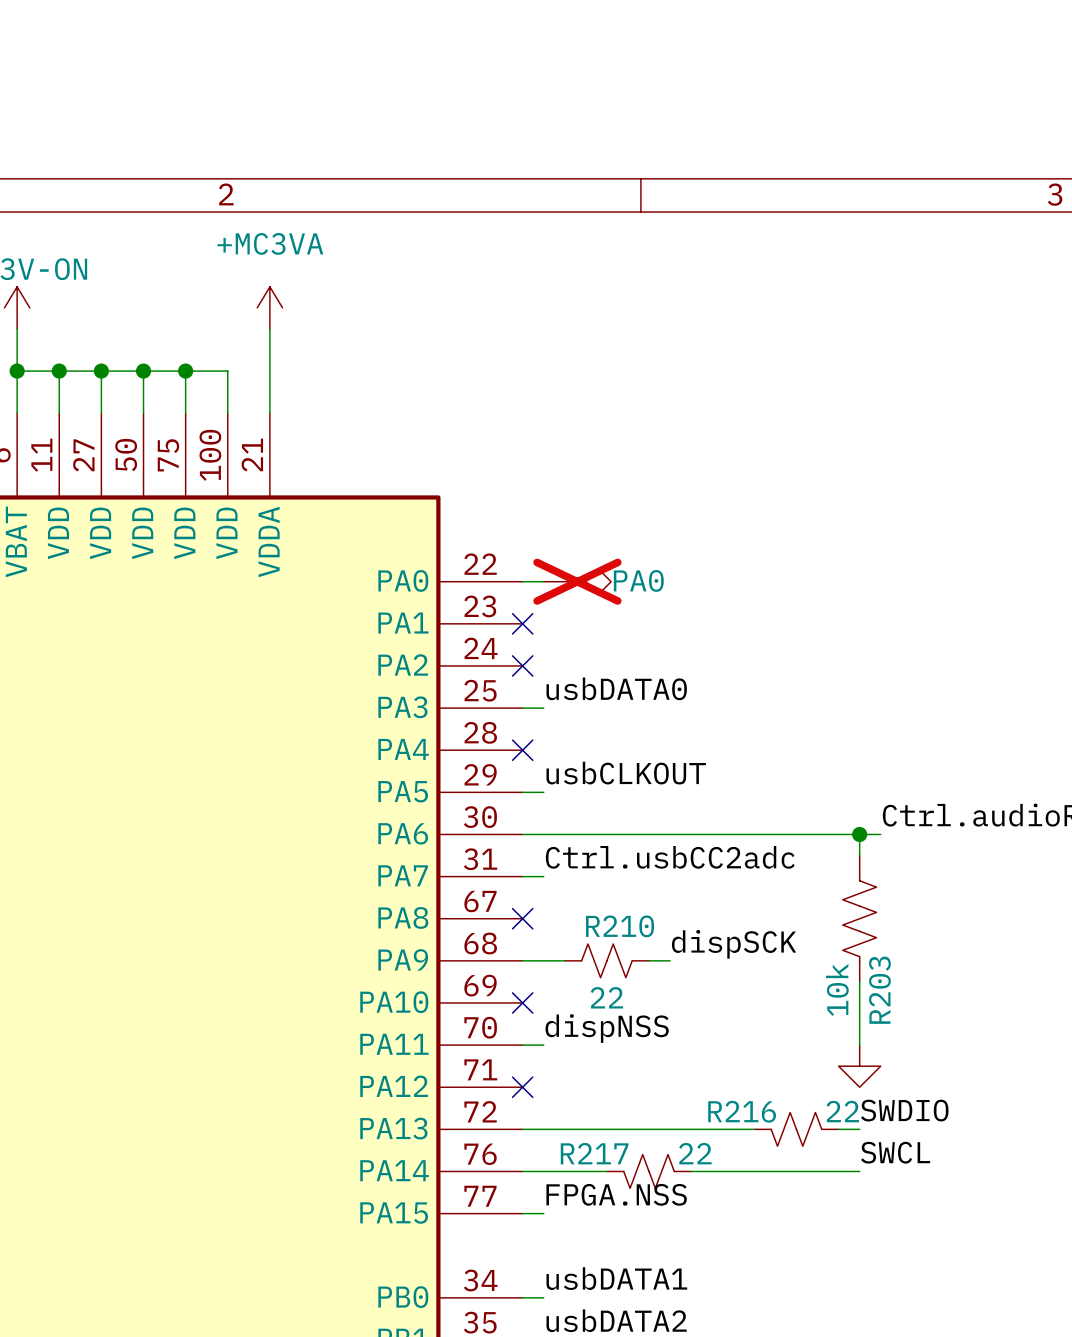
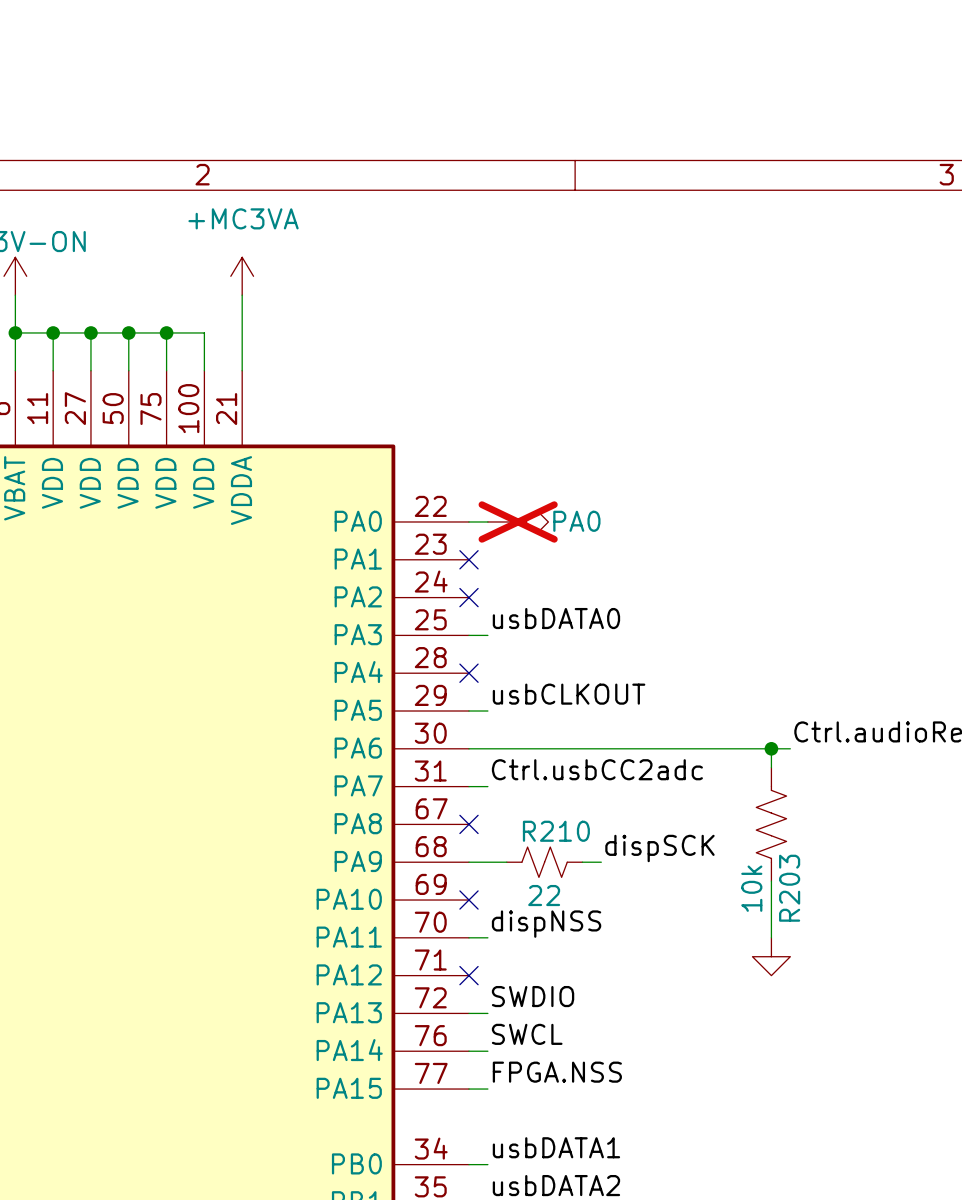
label position: SWDIO (904, 1110) -> SWDIO (533, 996)
wire: (543, 1129) (754, 1129) -> none
R216: 22 (796, 1129) -> none
wire: (838, 1129) (859, 1129) -> none
label position: SWCL (895, 1152) -> SWCL (527, 1034)
wire: (543, 1171) (606, 1171) -> none
R217: 22 (649, 1171) -> none
wire: (691, 1171) (859, 1171) -> none

